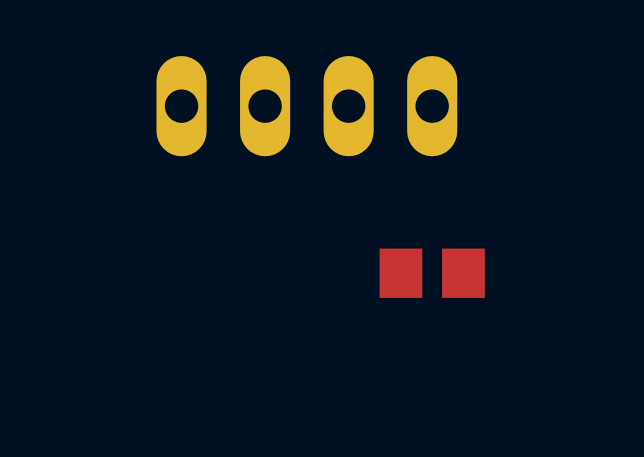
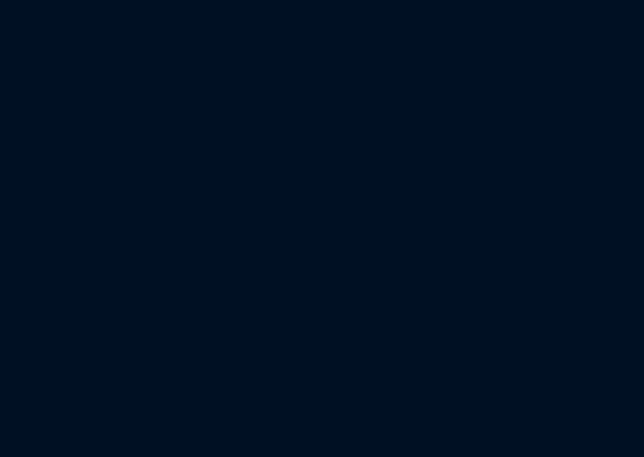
part: (306, 106) -> none
part: (432, 273) -> none

